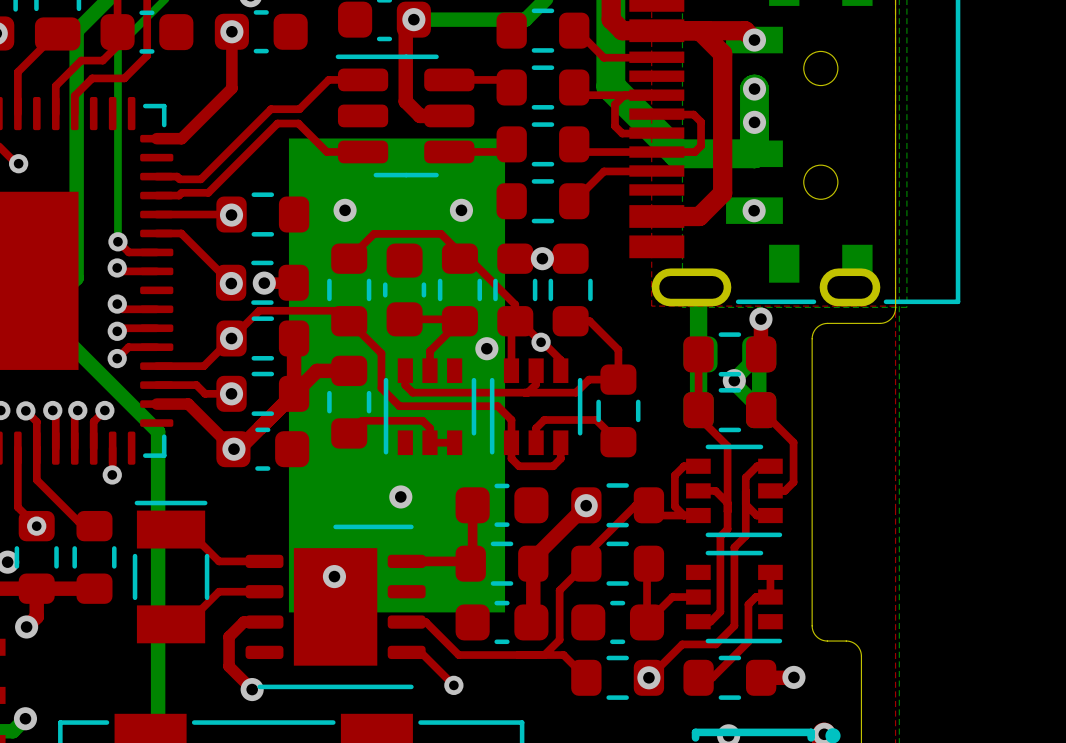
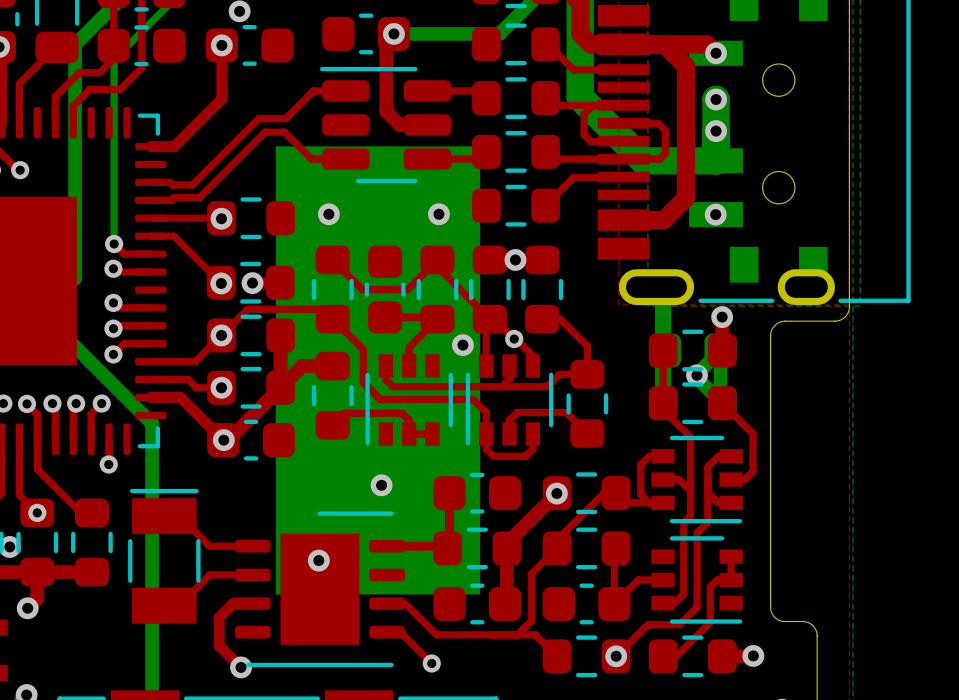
top track: (459, 252) (441, 233) (374, 233) (349, 258) -> (437, 259) (407, 289) (362, 289) (332, 259)
top track: (469, 258) (515, 304) (515, 321) -> none
top track: none -> (437, 266) (489, 319) (494, 319)

